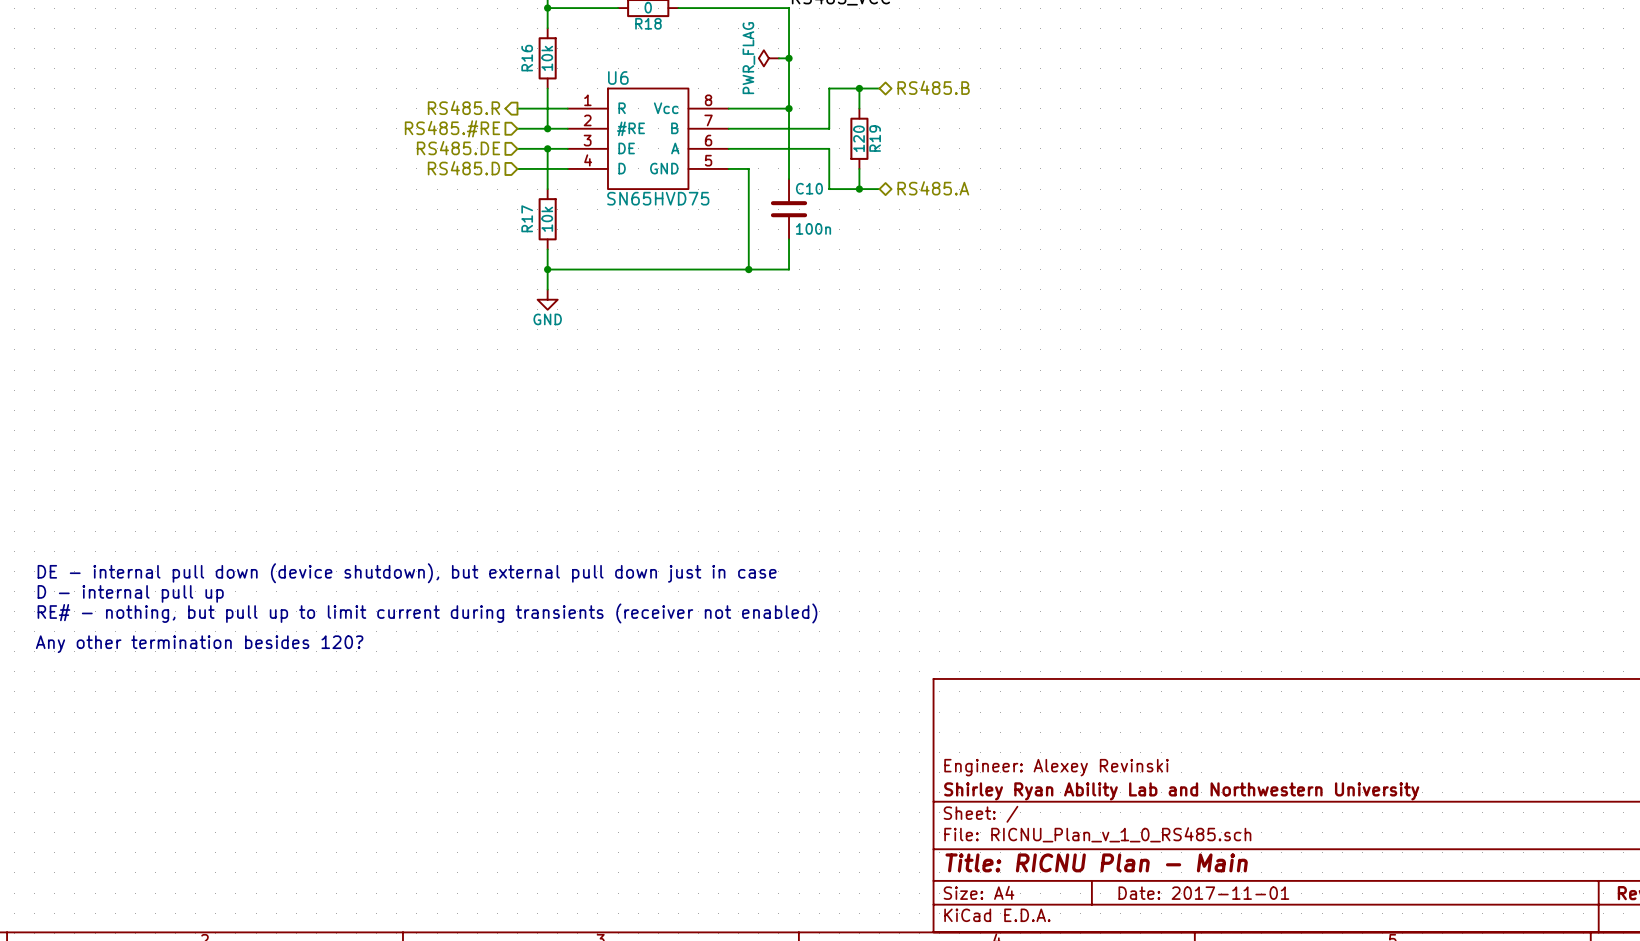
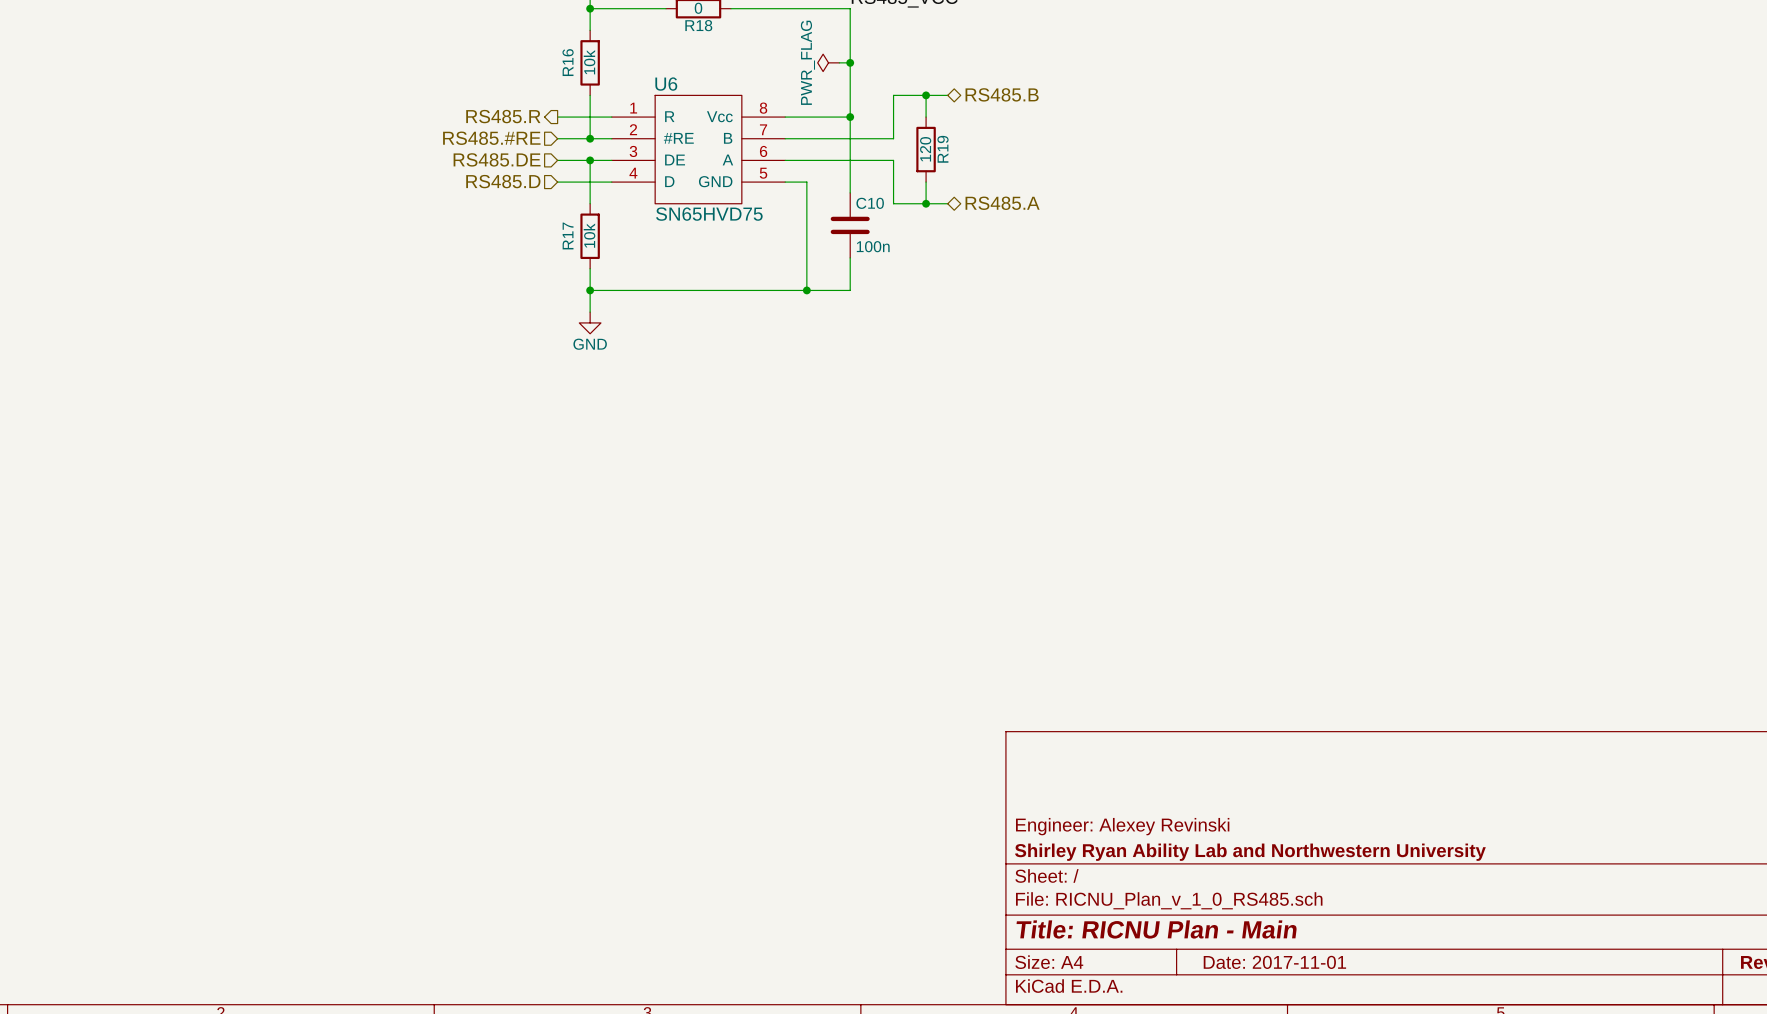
text: DE - internal pull down (device shutdown), but external pull down just in case (407, 573) -> none
text: D - internal pull up (130, 593) -> none
text: RE# - nothing, but pull up to limit current during transients (receiver not enabled) (427, 613) -> none
text: Any other termination besides 120? (199, 644) -> none

